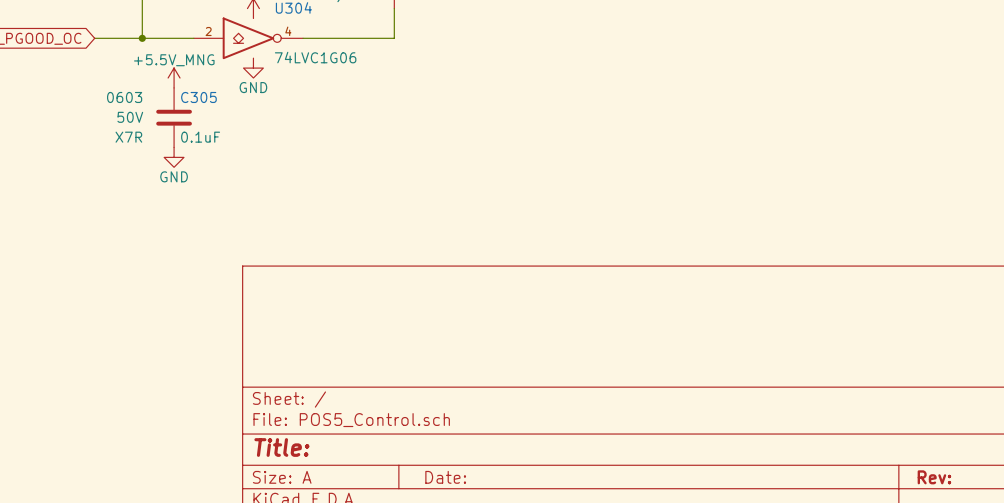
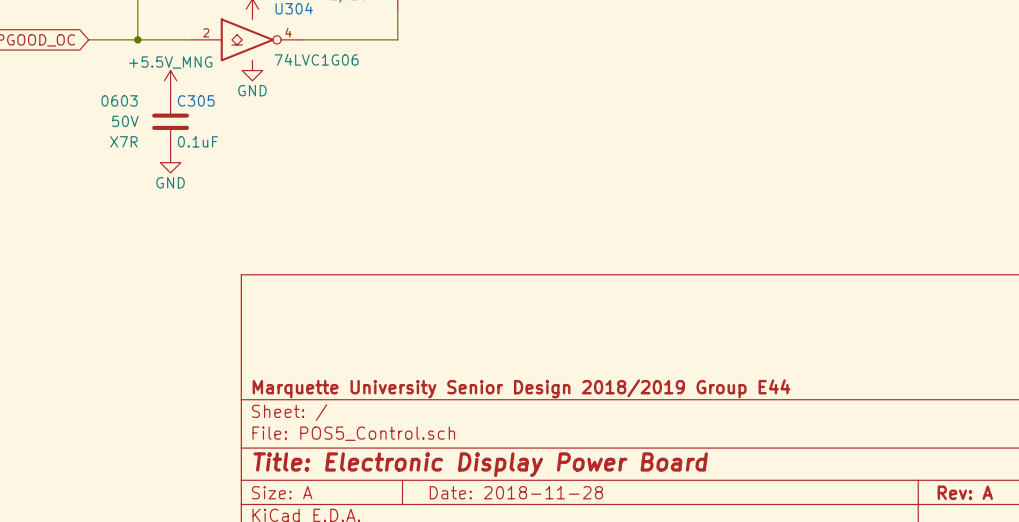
title block: none -> Marquette University Senior Design 2018/2019 Group E44 (521, 388)
title block: Title: (281, 447) -> Title: Electronic Display Power Board (480, 464)
title block: Date: (445, 477) -> Date: 2018-11-28 (516, 492)
title block: Rev: (934, 477) -> Rev: A (965, 492)

